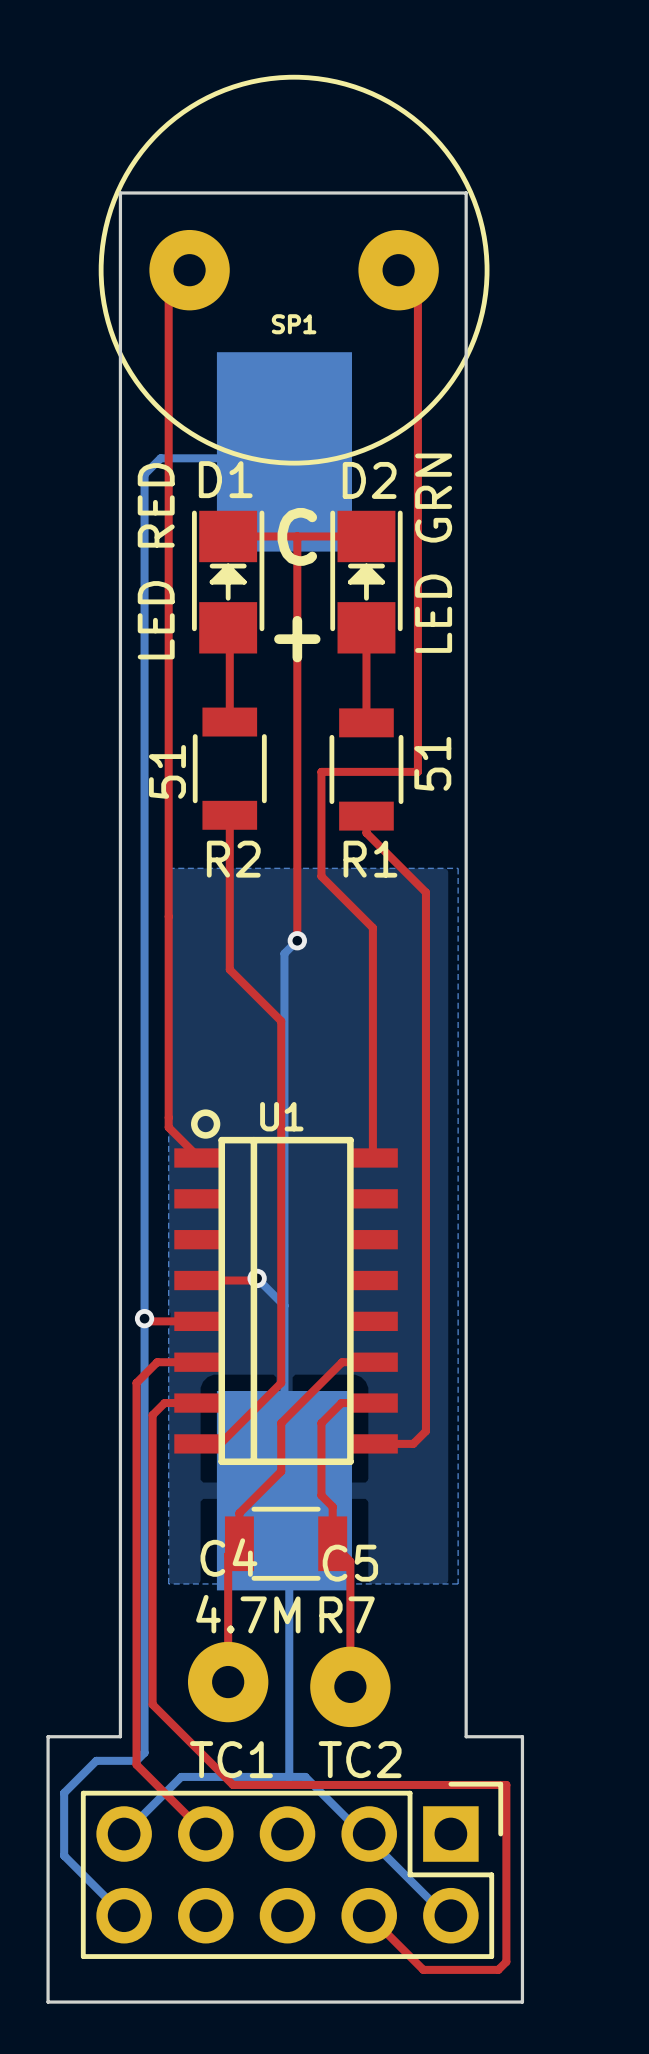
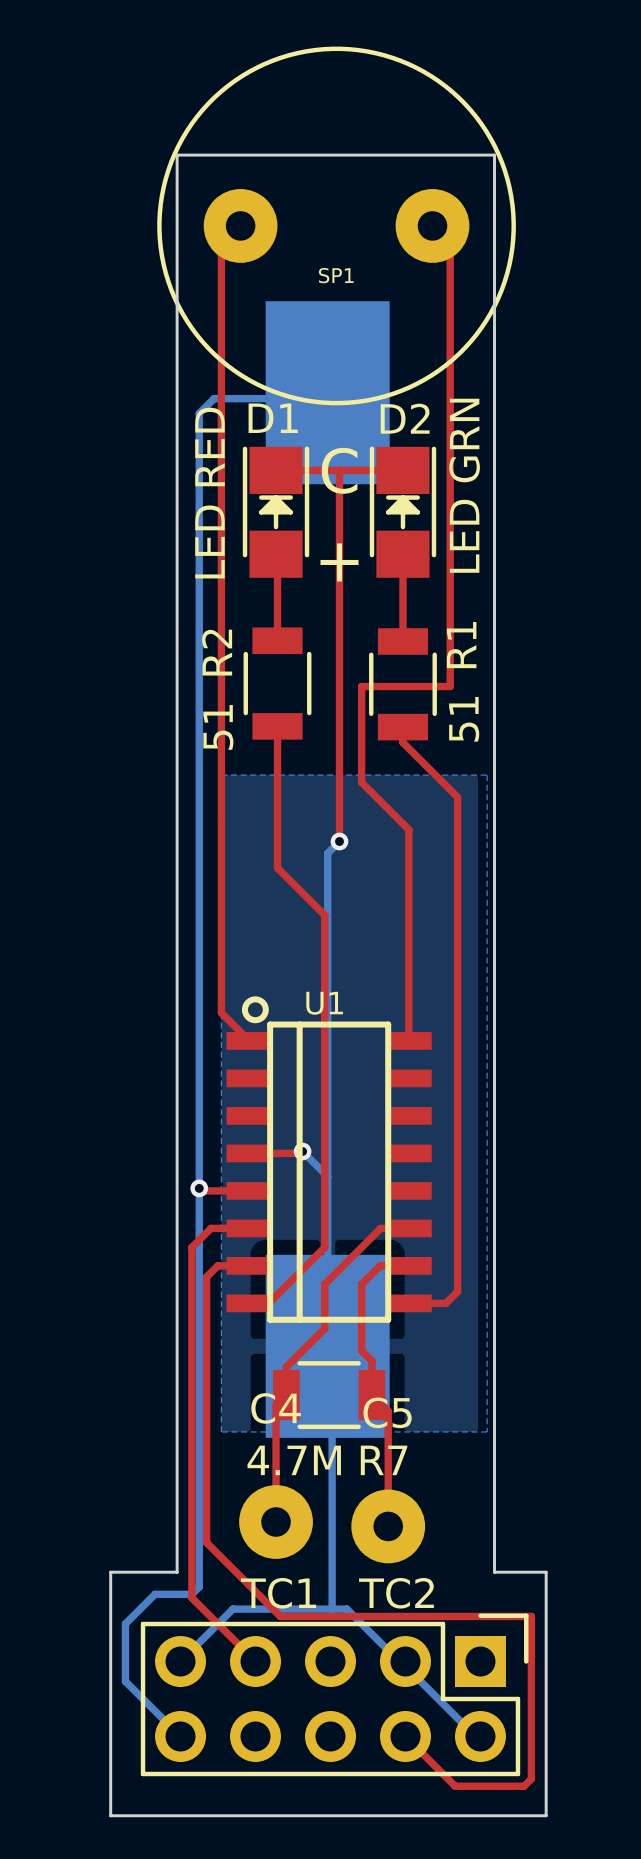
R1 value position: 51 (432, 763) -> 51 (464, 719)
R2 value position: 51 (167, 771) -> 51 (218, 727)
R2 name rotation: 0° (233, 859) -> 90° counterclockwise (217, 652)
R2 name position: R2 (233, 859) -> R2 (217, 652)
R1 name rotation: 0° (370, 859) -> 90° counterclockwise (461, 645)
R1 name position: R1 (370, 859) -> R1 (461, 645)

